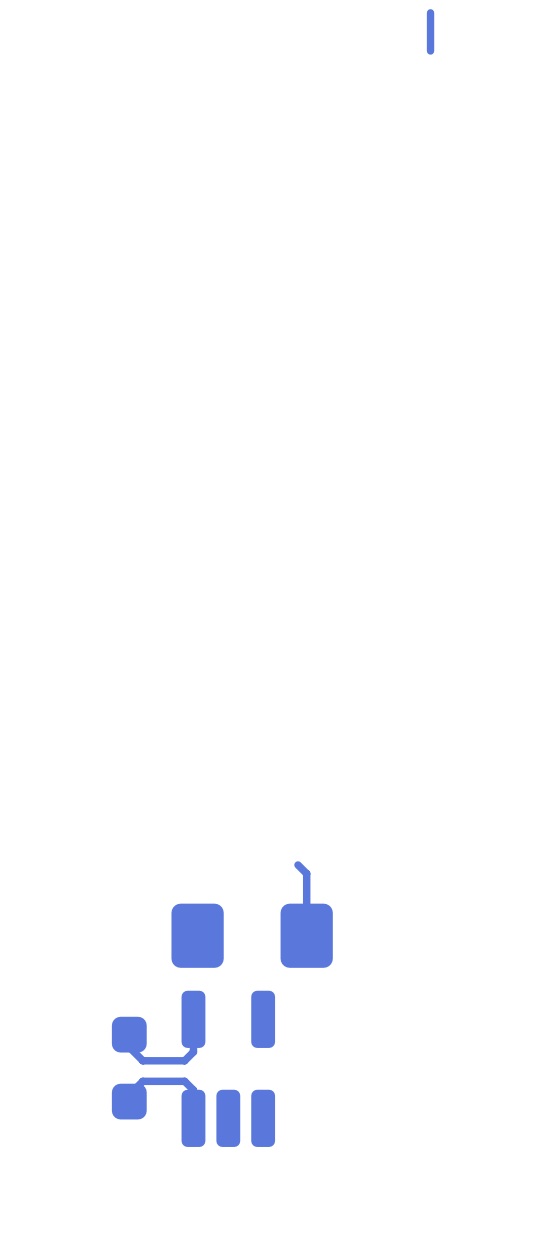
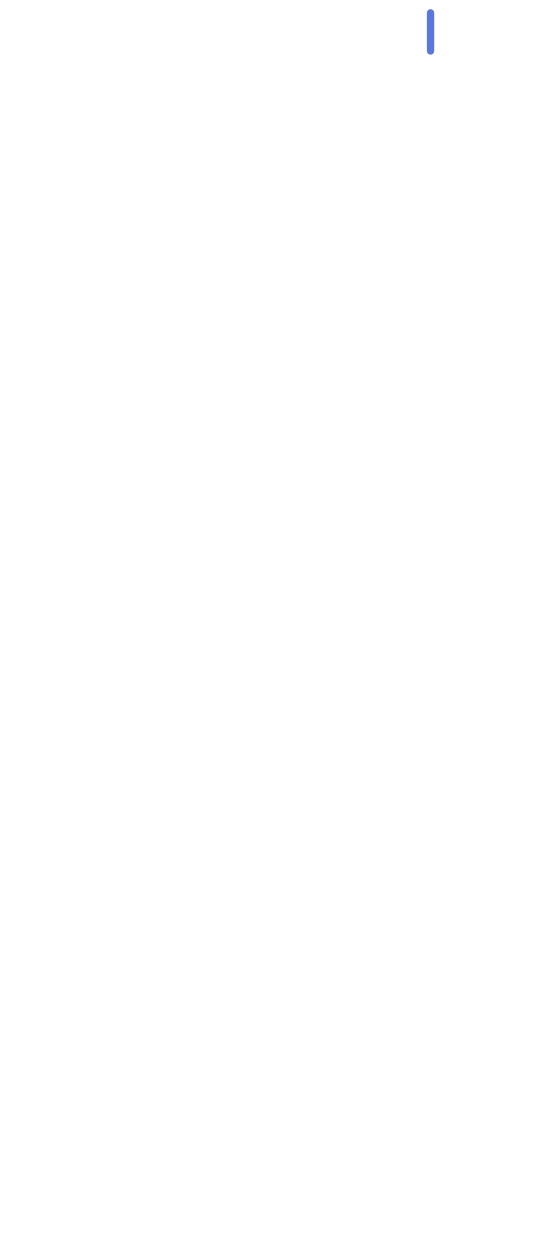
bottom track: (297, 864) (306, 873) (306, 935) -> none
part: (252, 935) -> none
bottom track: (193, 1019) (193, 1051) (184, 1060) (142, 1060) (129, 1047) (129, 1034) -> none
part: (129, 1068) -> none
part: (228, 1068) -> none
bottom track: (129, 1094) (142, 1081) (184, 1081) (193, 1090) (193, 1122) -> none

